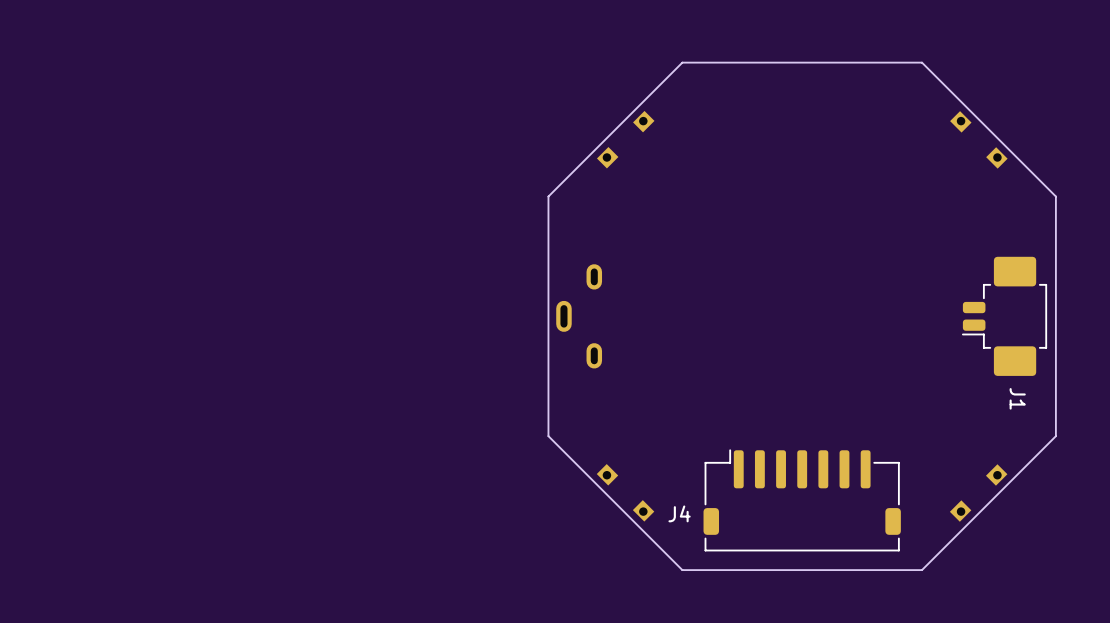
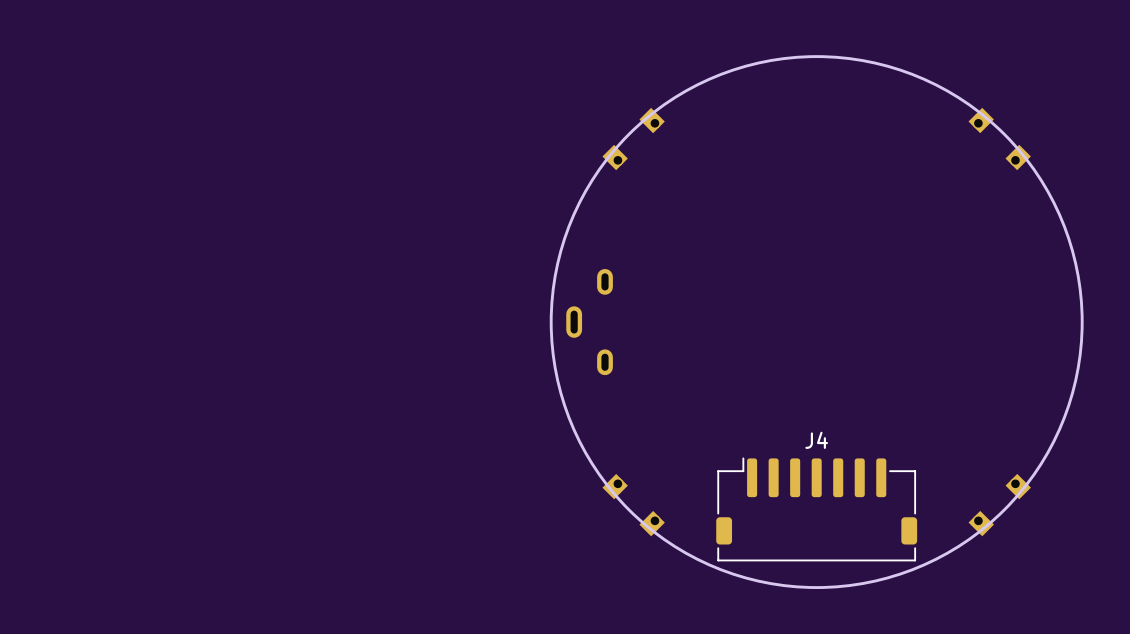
round board edge: none -> [549, 55, 1084, 590]
board edge: (922, 62) (682, 62) (548, 196) (548, 436) (682, 570) (922, 570) (1055, 436) (1055, 196) (922, 62) -> none
part footprint: [596, 110, 655, 169] -> [602, 107, 665, 171]
part footprint: [950, 111, 1008, 169] -> [968, 107, 1031, 171]
J1: (1004, 316) -> none
part footprint: [596, 464, 655, 522] -> [602, 473, 665, 537]
part footprint: [949, 464, 1008, 522] -> [968, 473, 1031, 537]
J4 name position: J4 (679, 513) -> J4 (816, 440)

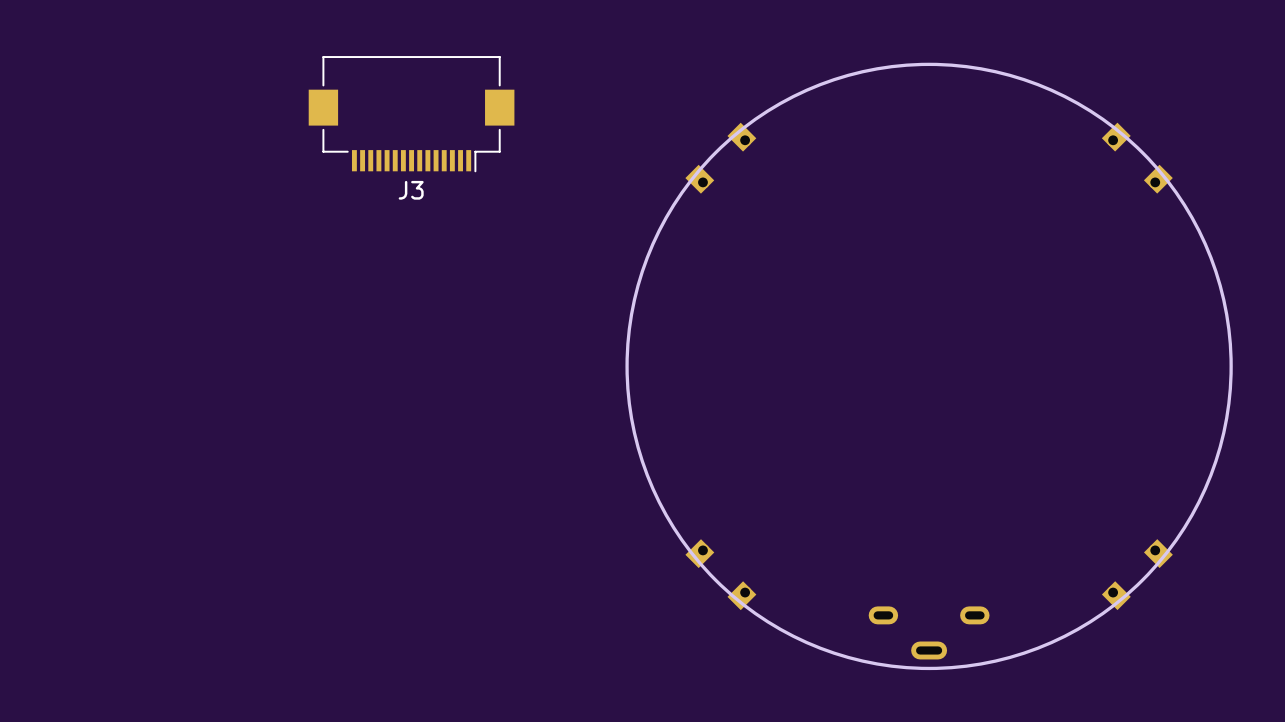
J3: none -> (411, 114)
part rotation: 0° (589, 322) -> 90° counterclockwise (929, 632)
part position: (589, 322) -> (929, 632)
J4: (816, 509) -> none

